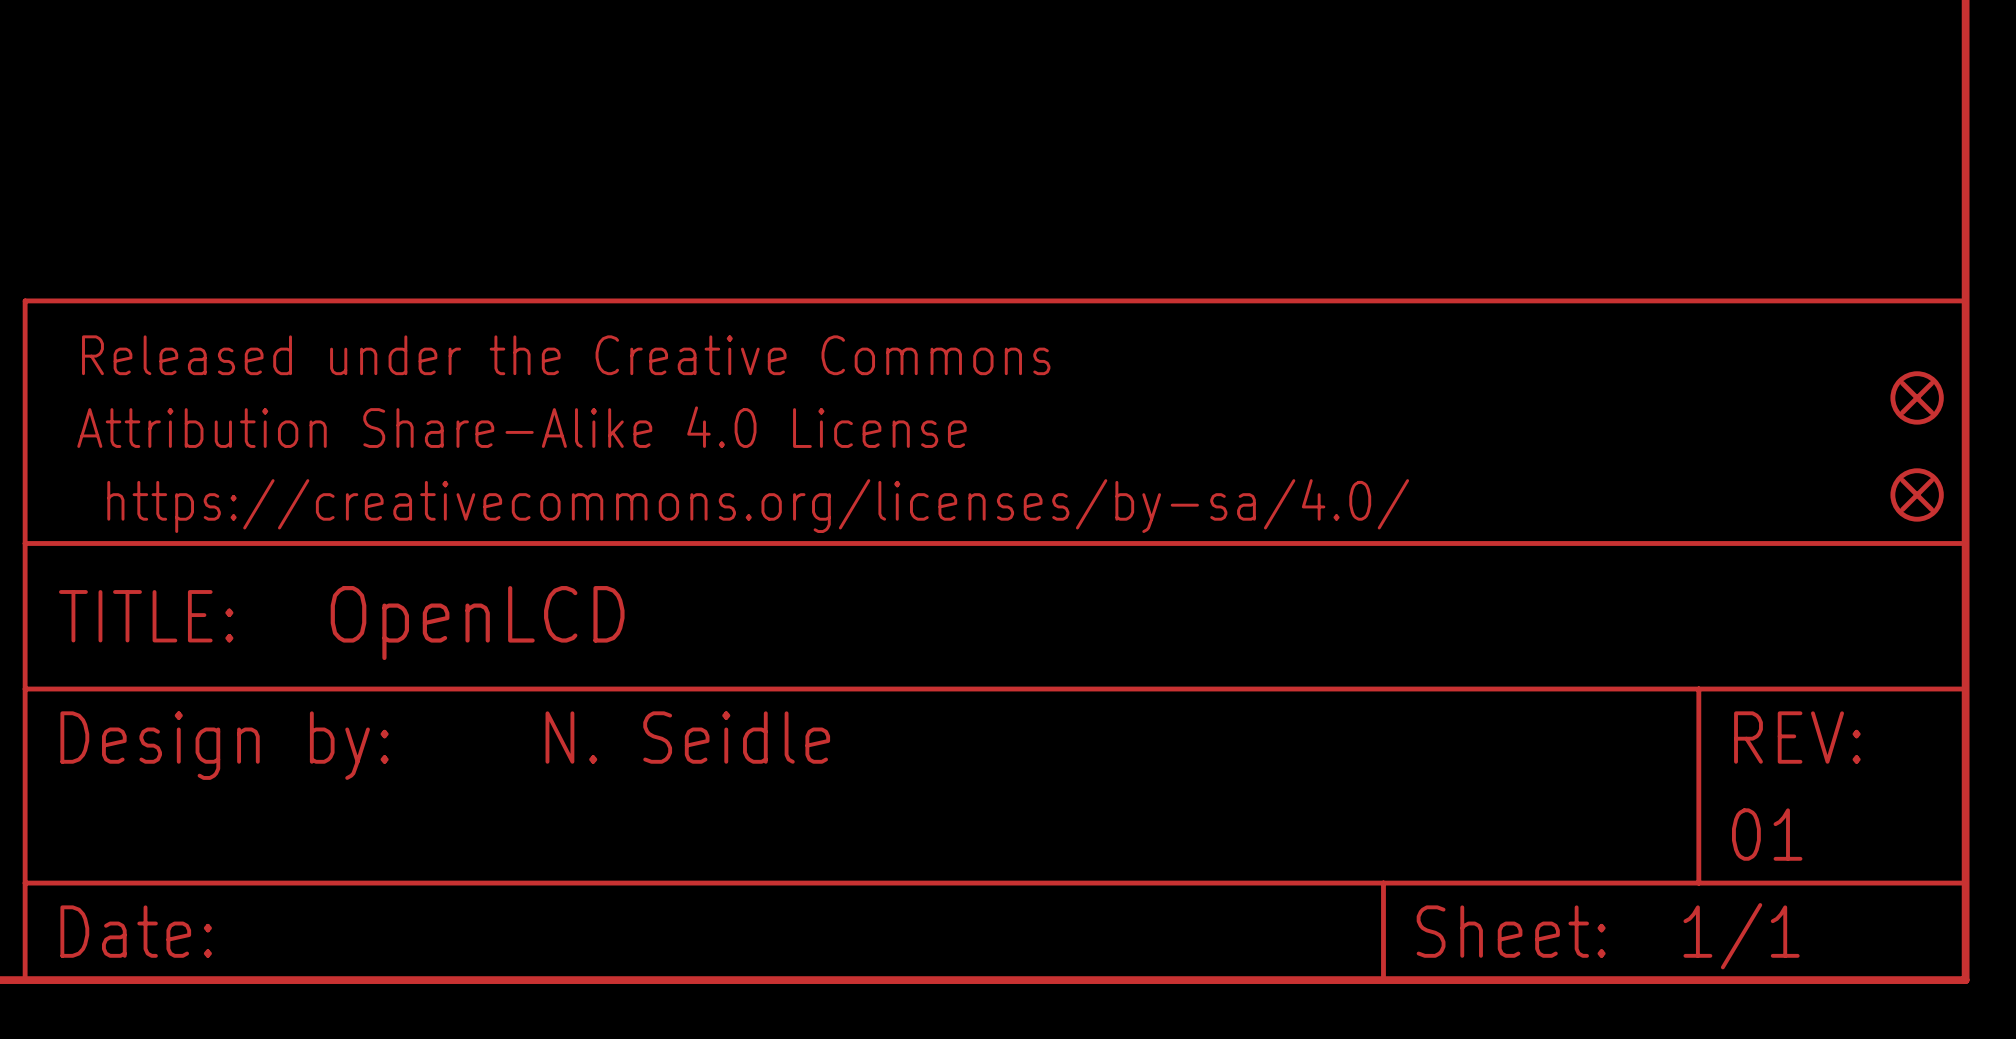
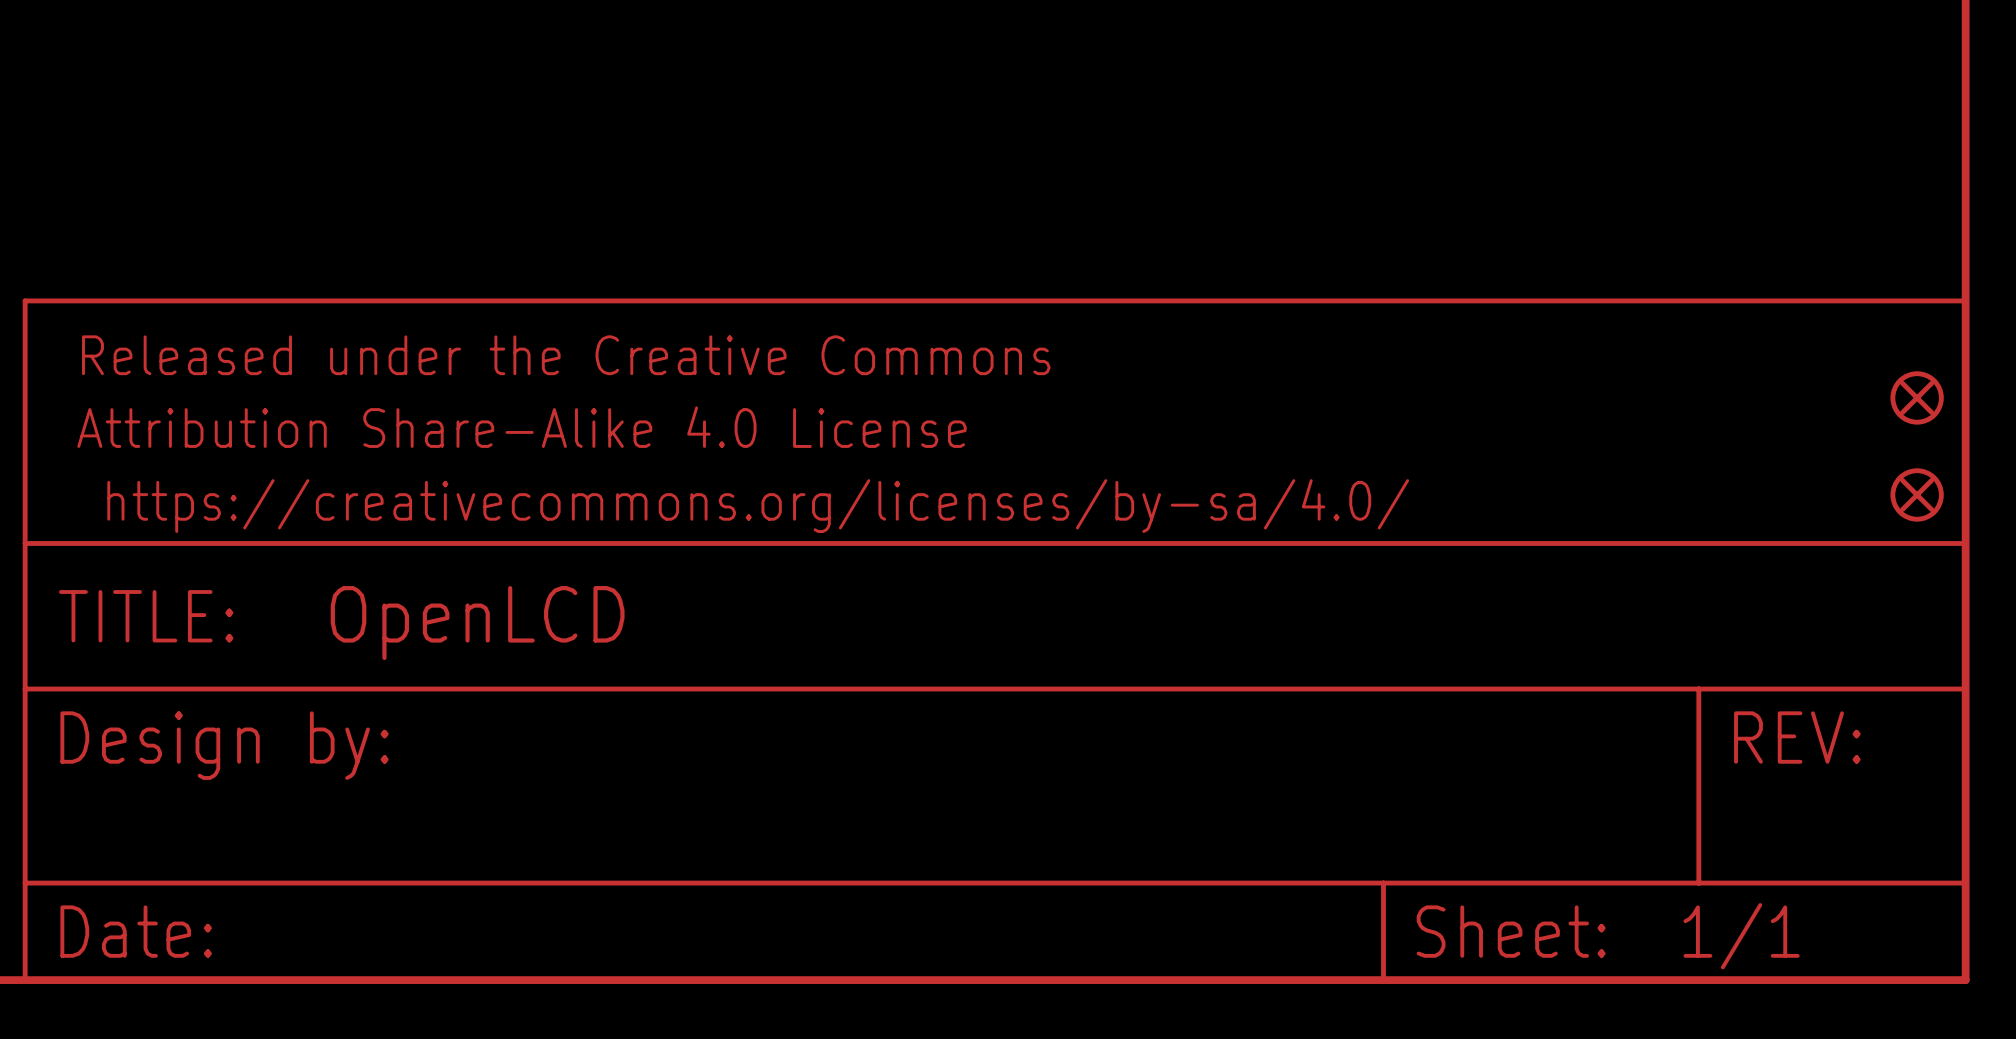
part text: N. Seidle (687, 737) -> none
part text: 01 (1767, 834) -> none

